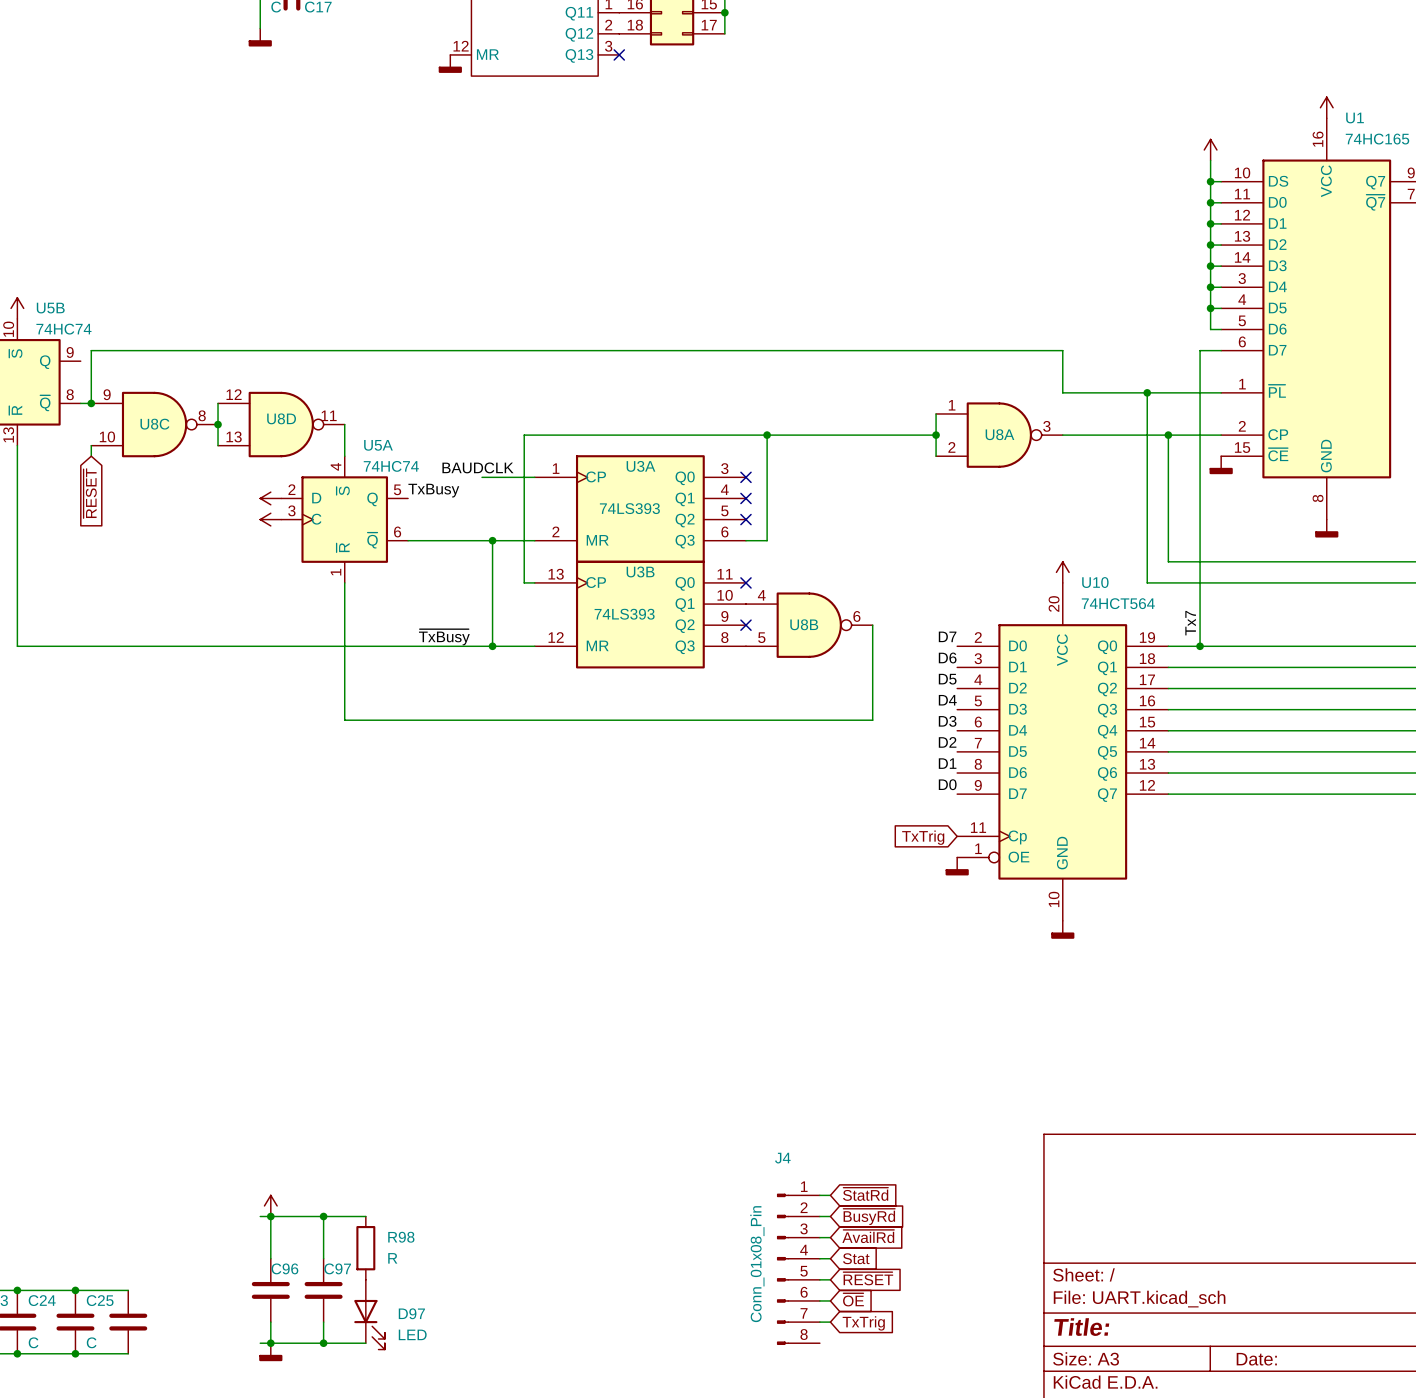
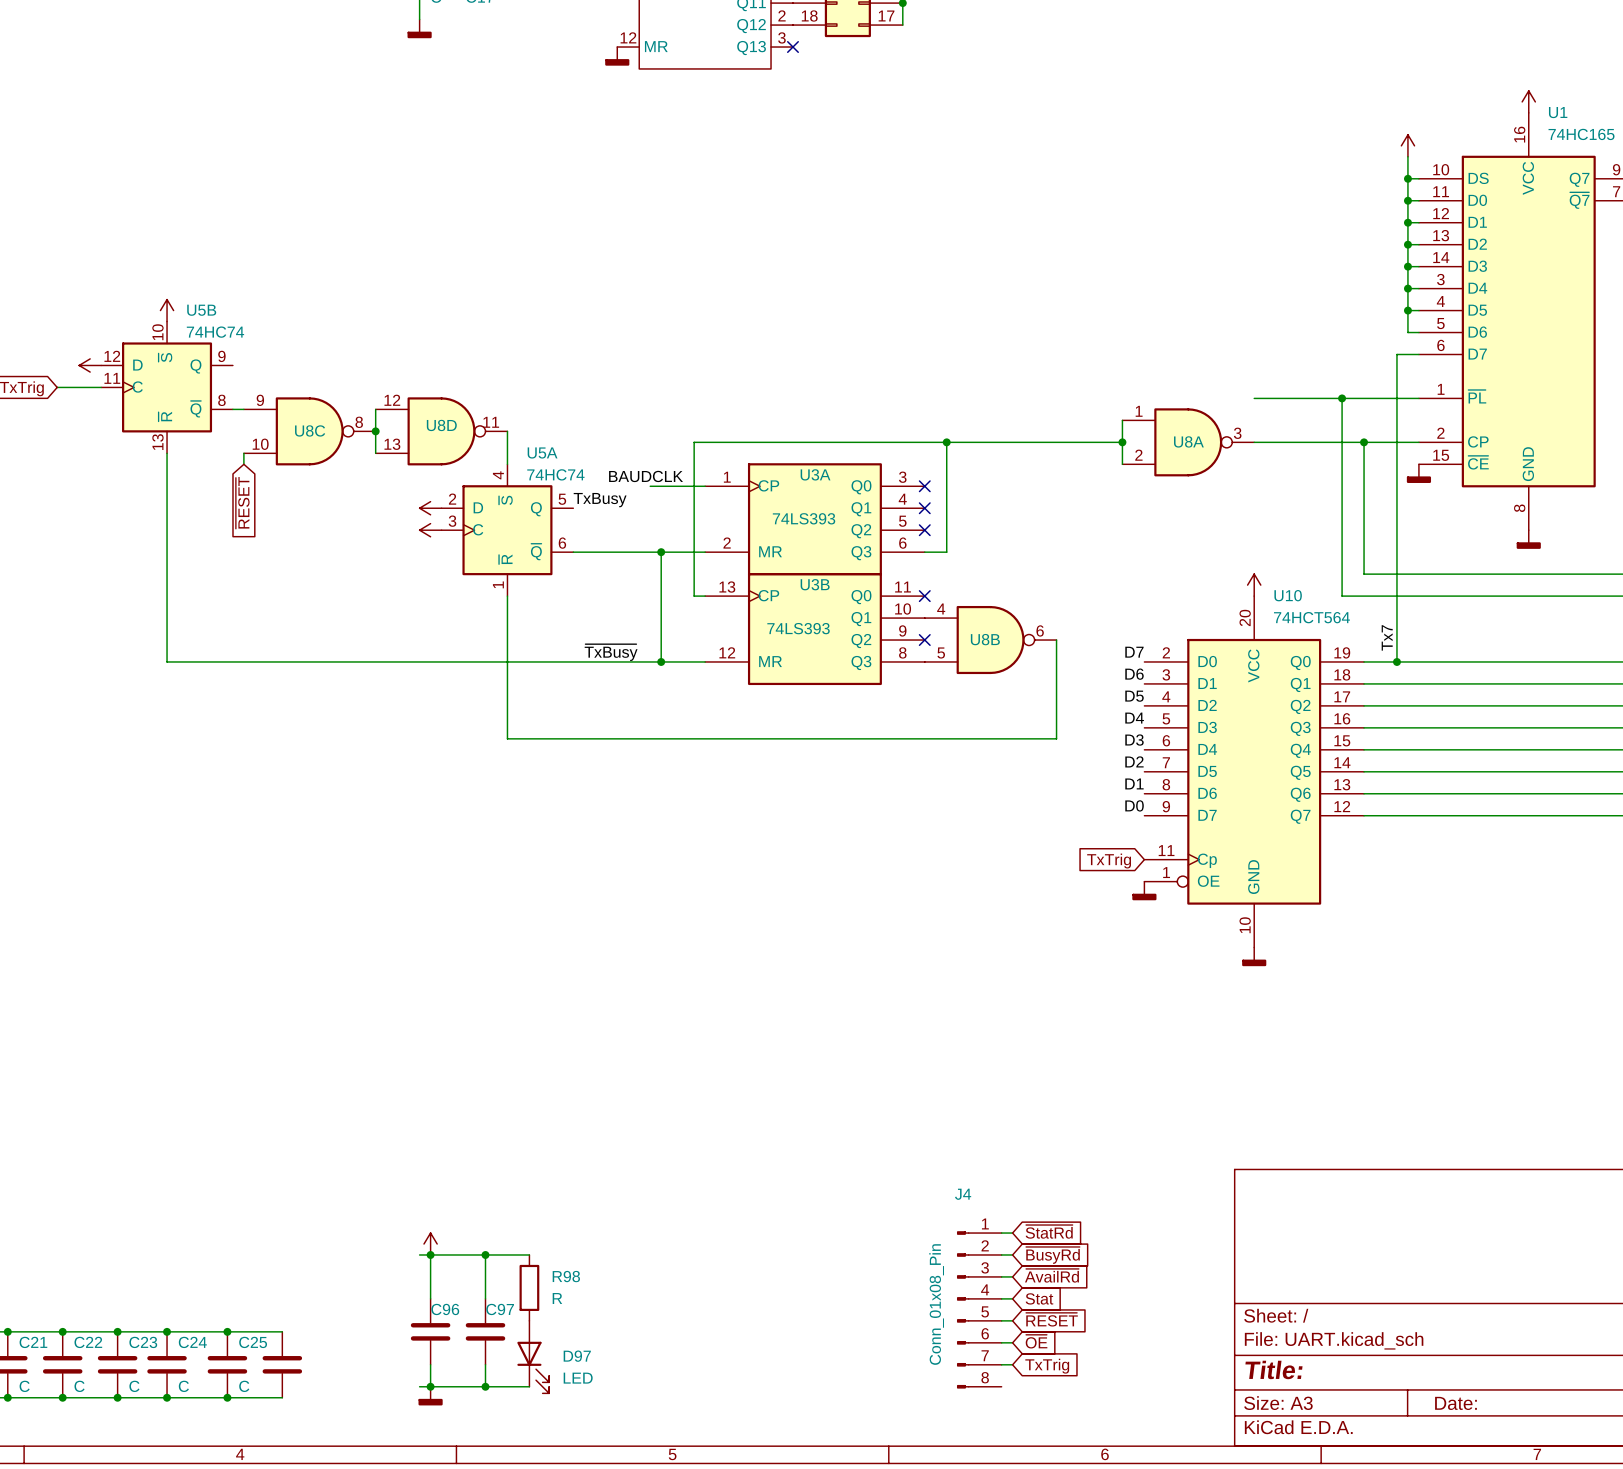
wire: (1062, 392) (1062, 350) (91, 350) (91, 403) -> none
junction: (91, 403) -> none

